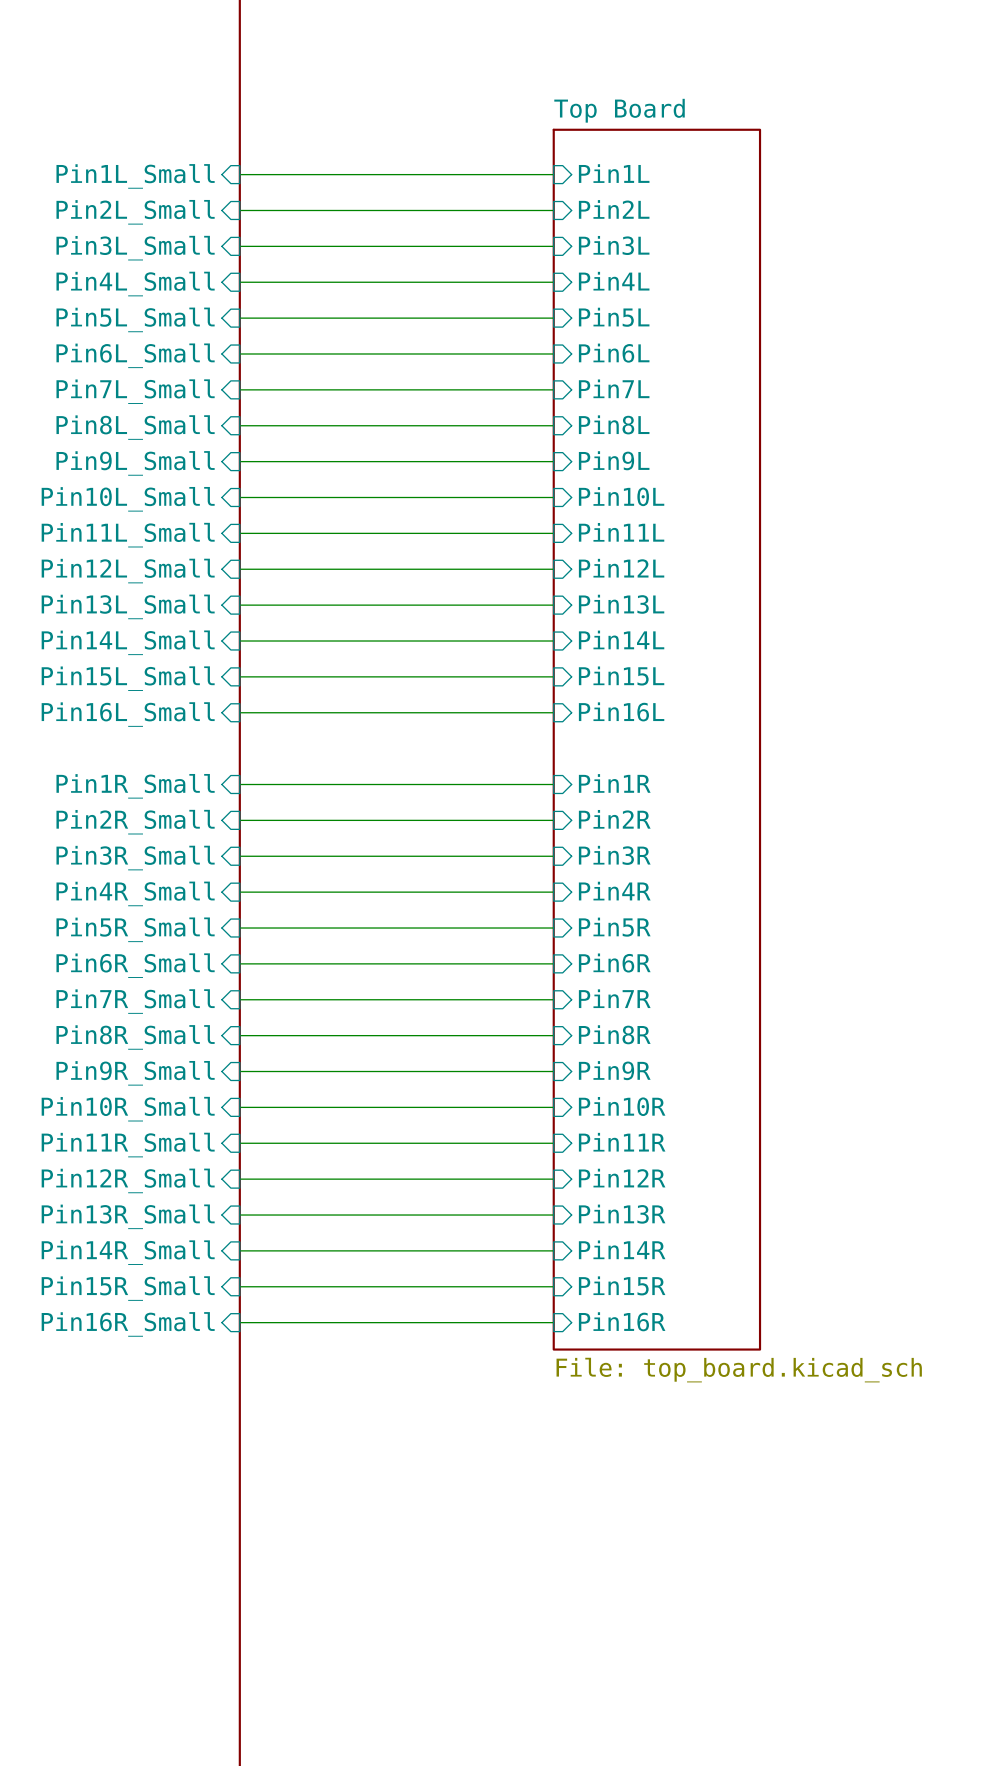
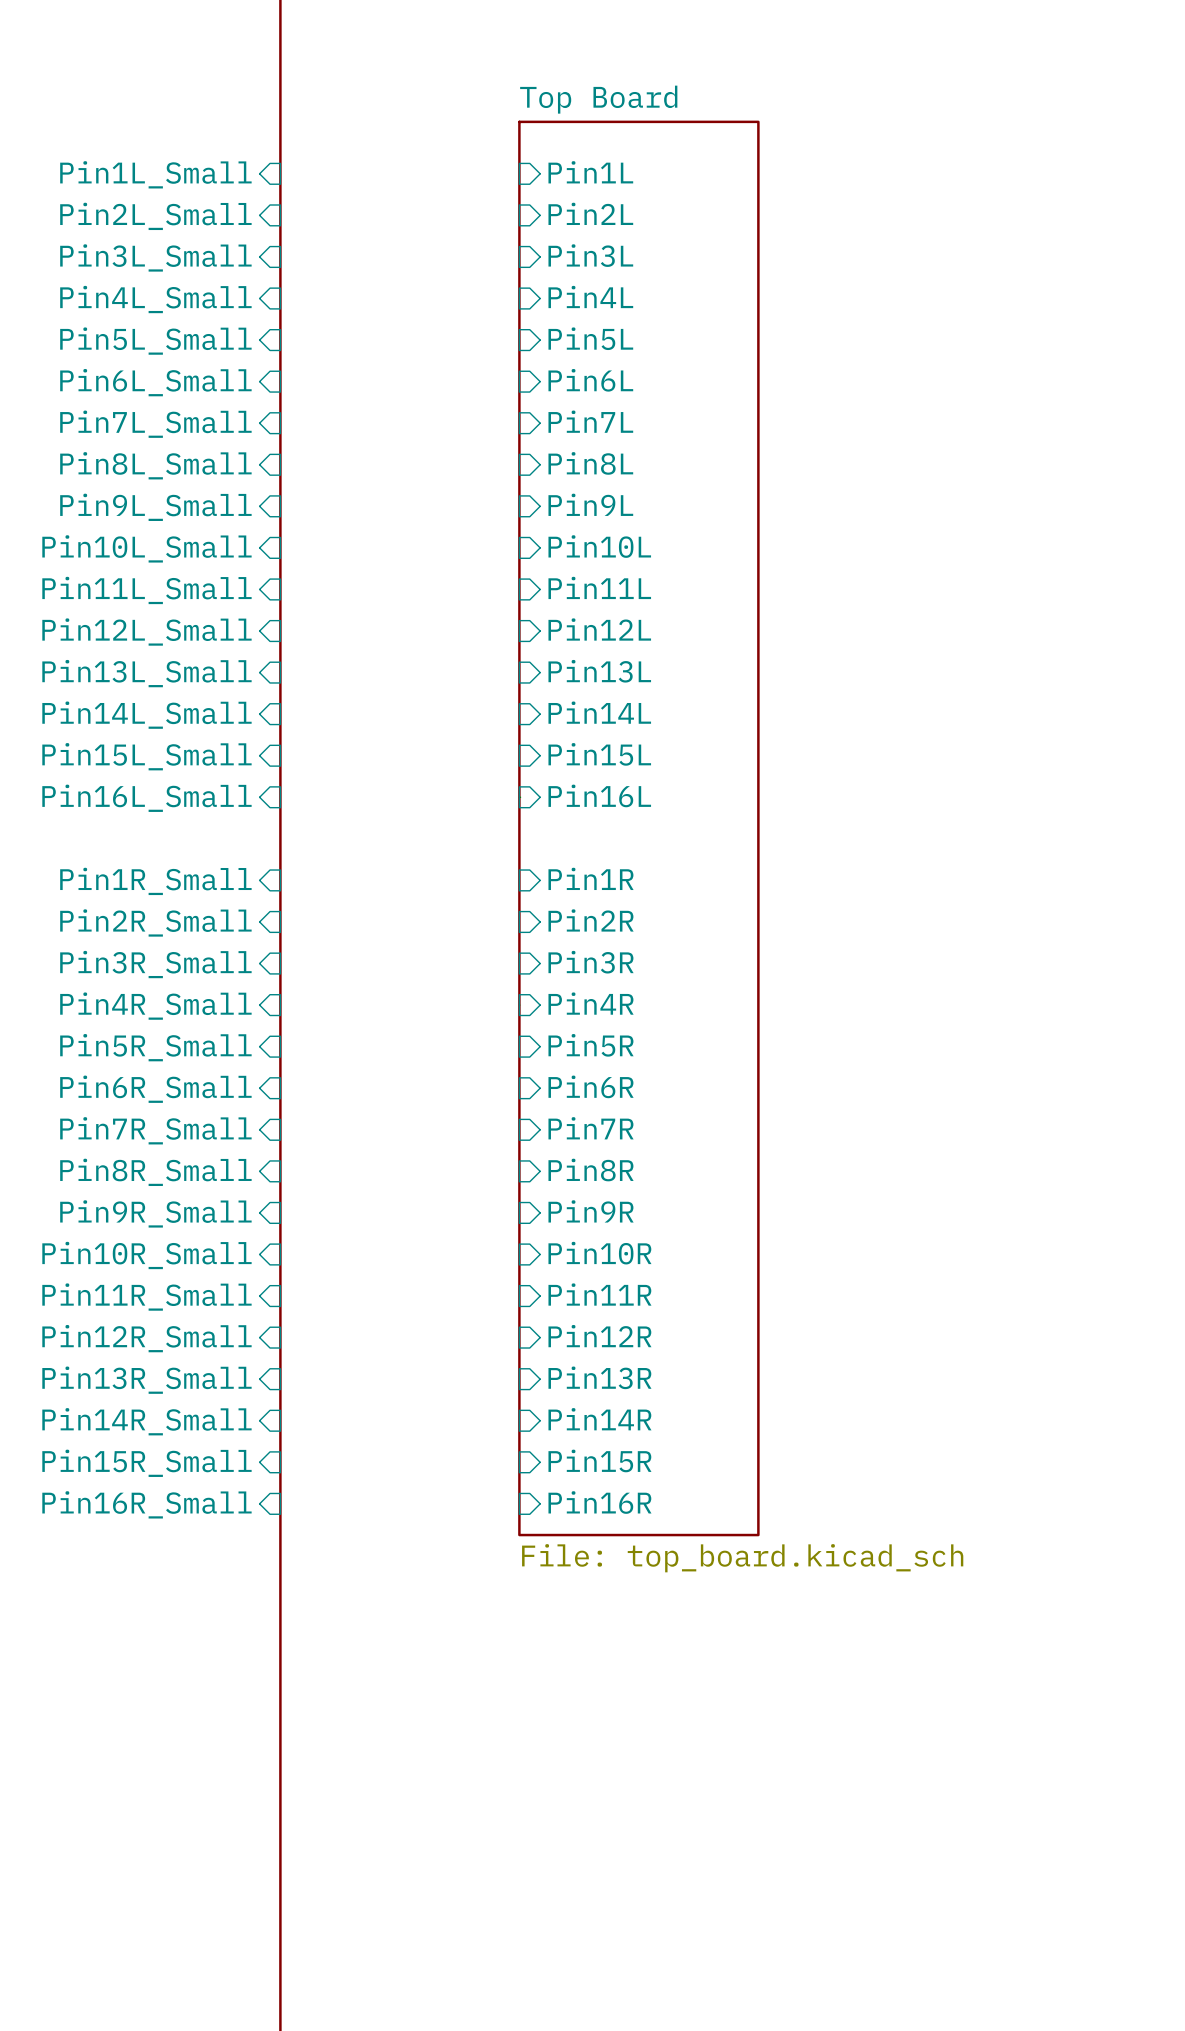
sheet pin position: Pin1L (614, 173) -> Pin1L (590, 172)
wire: (239, 174) (553, 174) -> none
sheet pin position: Pin2L (614, 209) -> Pin2L (590, 213)
wire: (239, 210) (553, 210) -> none
sheet pin position: Pin3L (614, 245) -> Pin3L (590, 255)
wire: (239, 246) (553, 246) -> none
sheet pin position: Pin4L (614, 281) -> Pin4L (590, 296)
wire: (239, 282) (553, 282) -> none
sheet pin position: Pin5L (614, 317) -> Pin5L (590, 338)
wire: (239, 318) (553, 318) -> none
wire: (239, 353) (553, 353) -> none
sheet pin position: Pin6L (614, 353) -> Pin6L (590, 380)
sheet pin position: Pin7L (614, 388) -> Pin7L (590, 421)
wire: (239, 389) (553, 389) -> none
sheet pin position: Pin8L (614, 424) -> Pin8L (590, 463)
wire: (239, 425) (553, 425) -> none
sheet pin position: Pin9L (614, 460) -> Pin9L (590, 504)
wire: (239, 461) (553, 461) -> none
sheet pin position: Pin10L (621, 496) -> Pin10L (599, 546)
wire: (239, 497) (553, 497) -> none
sheet pin position: Pin11L (621, 532) -> Pin11L (599, 587)
wire: (239, 533) (553, 533) -> none
sheet pin position: Pin12L (621, 568) -> Pin12L (599, 629)
wire: (239, 569) (553, 569) -> none
sheet pin position: Pin13L (621, 604) -> Pin13L (599, 671)
wire: (239, 605) (553, 605) -> none
sheet pin position: Pin14L (621, 639) -> Pin14L (599, 712)
wire: (239, 641) (553, 641) -> none
wire: (239, 676) (553, 676) -> none
sheet pin position: Pin15L (621, 676) -> Pin15L (599, 754)
sheet pin position: Pin16L (621, 711) -> Pin16L (599, 795)
wire: (239, 712) (446, 712) -> none
wire: (447, 712) (553, 712) -> none
sheet Top Board position: (656, 739) -> (638, 828)
sheet pin position: Pin1R (614, 783) -> Pin1R (591, 878)
wire: (239, 784) (553, 784) -> none
sheet pin position: Pin2R (614, 819) -> Pin2R (591, 920)
wire: (239, 820) (553, 820) -> none
sheet pin position: Pin3R (614, 855) -> Pin3R (591, 962)
wire: (239, 856) (553, 856) -> none
sheet pin position: Pin4R (614, 891) -> Pin4R (591, 1003)
wire: (239, 892) (446, 892) -> none
wire: (446, 892) (553, 892) -> none
sheet pin position: Pin5R (614, 927) -> Pin5R (591, 1045)
wire: (239, 928) (553, 928) -> none
wire: (239, 963) (553, 963) -> none
sheet pin position: Pin6R (614, 963) -> Pin6R (591, 1086)
sheet pin position: Pin7R (614, 998) -> Pin7R (591, 1128)
wire: (239, 999) (553, 999) -> none
sheet pin position: Pin8R (614, 1034) -> Pin8R (591, 1170)
wire: (239, 1035) (553, 1035) -> none
sheet pin position: Pin9R (614, 1070) -> Pin9R (591, 1211)
wire: (239, 1071) (553, 1071) -> none
sheet pin position: Pin10R (622, 1106) -> Pin10R (599, 1253)
wire: (239, 1107) (553, 1107) -> none
sheet pin position: Pin11R (622, 1142) -> Pin11R (599, 1294)
wire: (239, 1143) (553, 1143) -> none
sheet pin position: Pin12R (622, 1178) -> Pin12R (599, 1336)
wire: (239, 1179) (553, 1179) -> none
sheet pin position: Pin13R (622, 1214) -> Pin13R (599, 1377)
wire: (239, 1215) (553, 1215) -> none
sheet pin position: Pin14R (622, 1249) -> Pin14R (599, 1419)
wire: (239, 1250) (553, 1250) -> none
sheet pin position: Pin15R (622, 1285) -> Pin15R (599, 1460)
wire: (239, 1286) (553, 1286) -> none
sheet pin position: Pin16R (622, 1321) -> Pin16R (599, 1502)
wire: (239, 1322) (553, 1322) -> none

